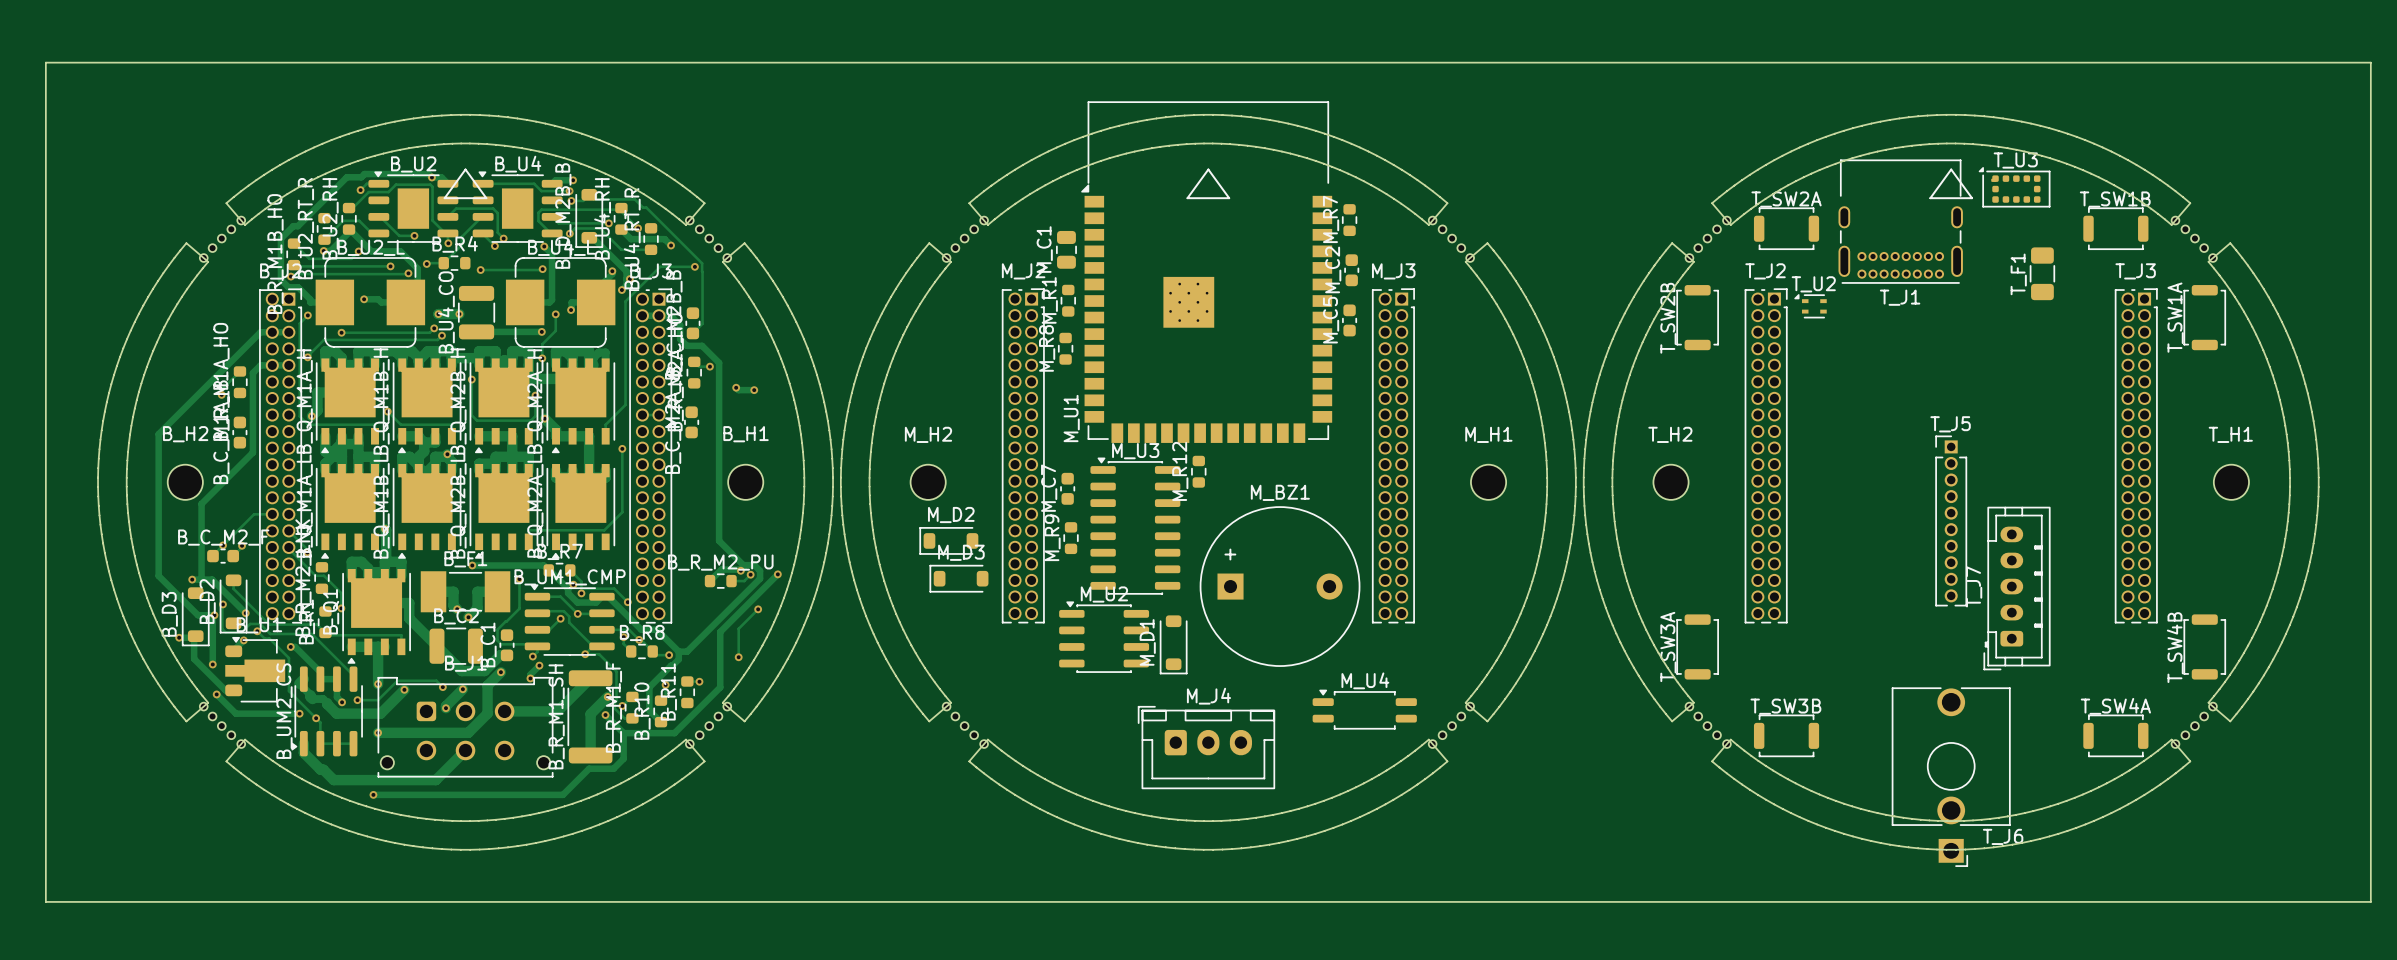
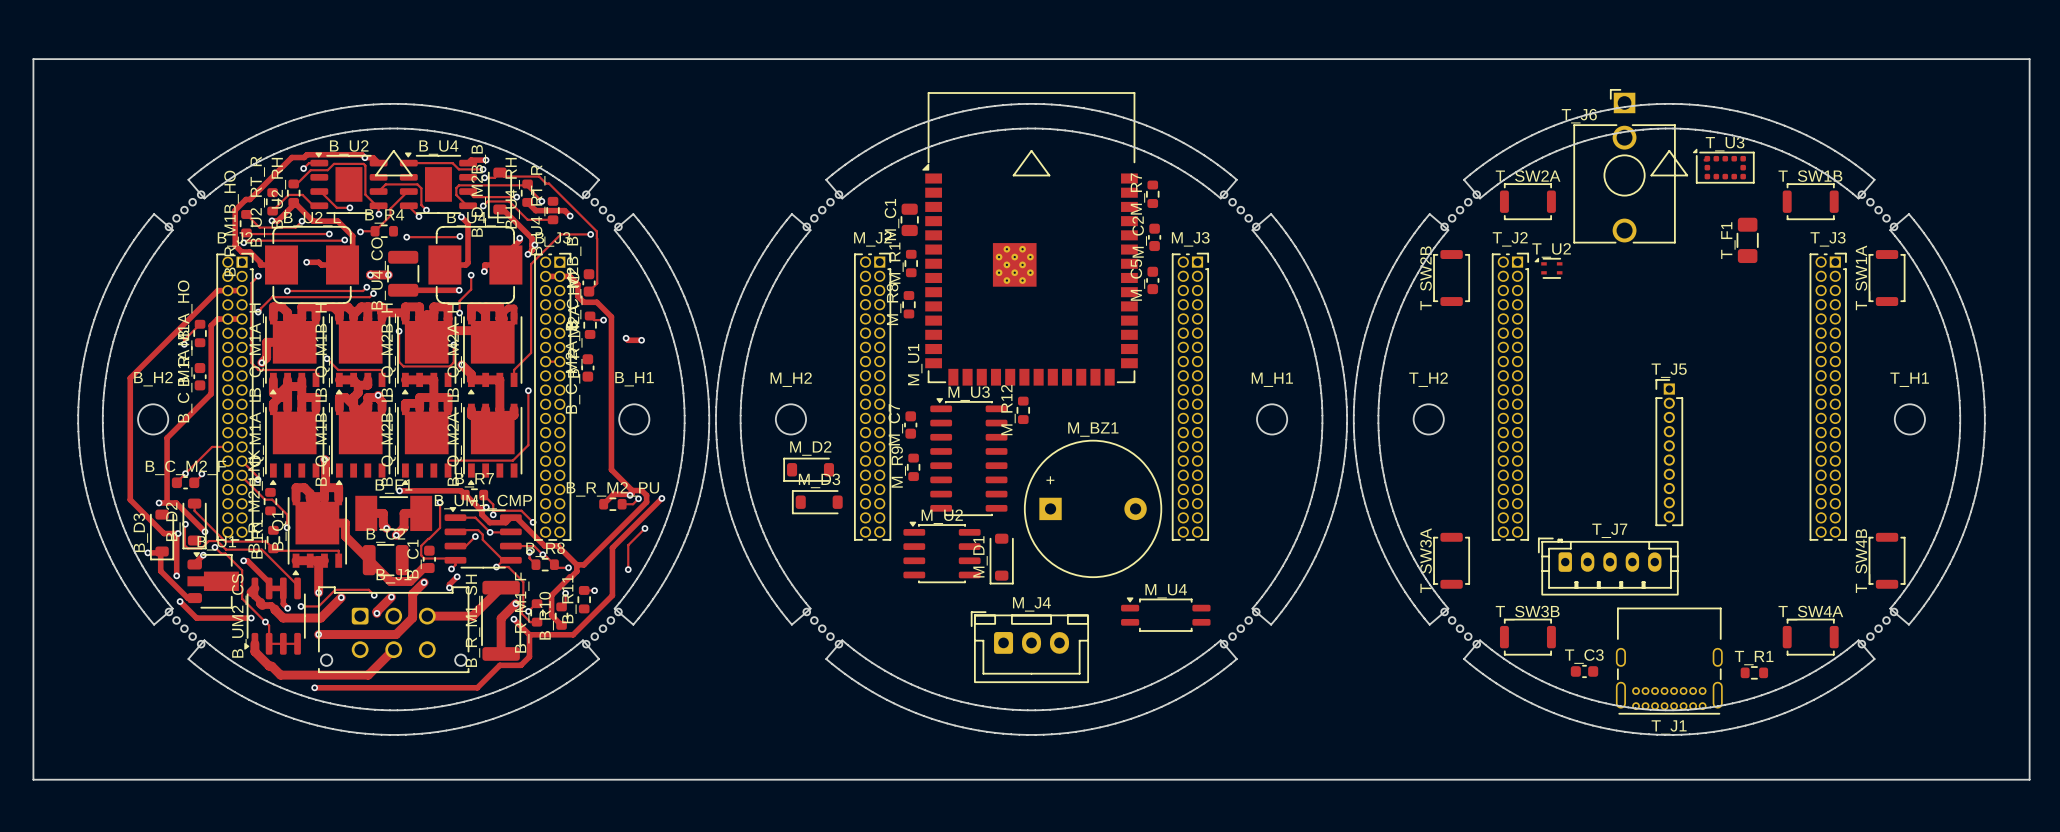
T_J1 position: (1900, 221) -> (1669, 661)
T_J7 rotation: 0° (2017, 588) -> 90° clockwise (1608, 566)
T_J7 position: (2017, 588) -> (1608, 566)
T_C3: none -> (1584, 671)
T_J6 rotation: 0° (1951, 777) -> 180° (1624, 166)
T_J6 position: (1951, 777) -> (1624, 166)
T_R1: none -> (1754, 672)

